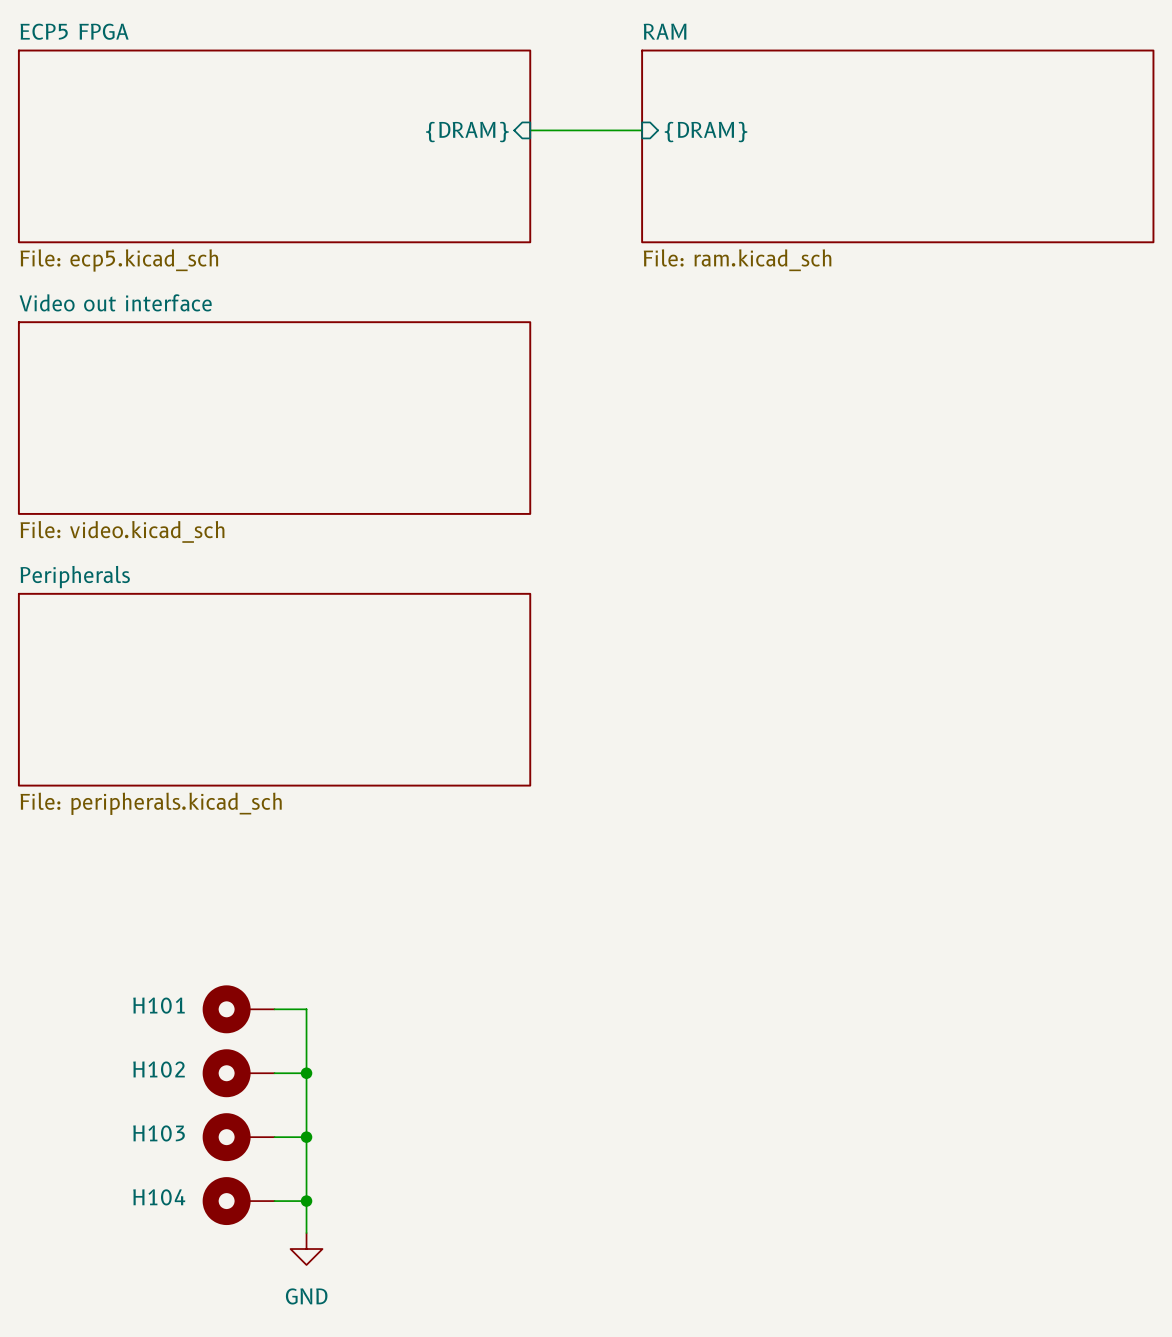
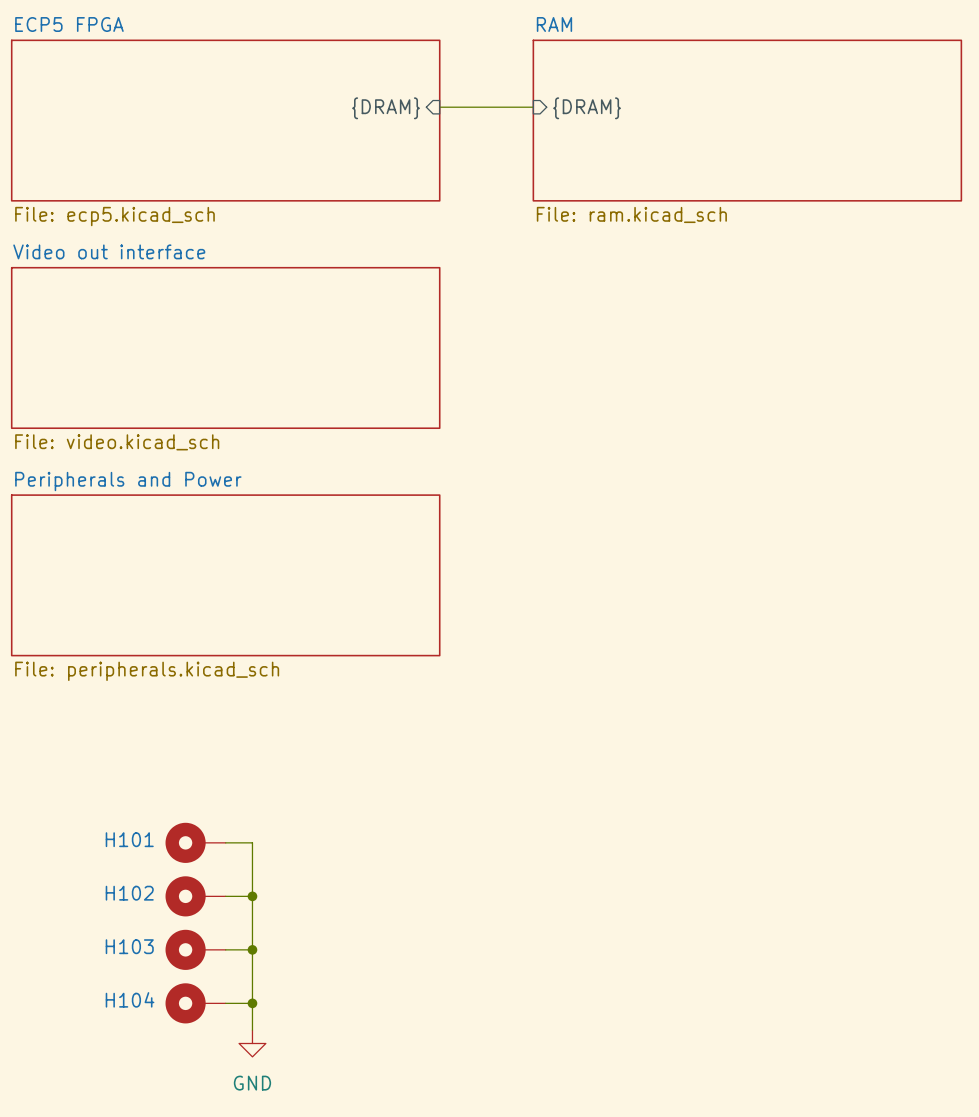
sheet Peripherals name: Peripherals (75, 577) -> Peripherals and Power (128, 481)

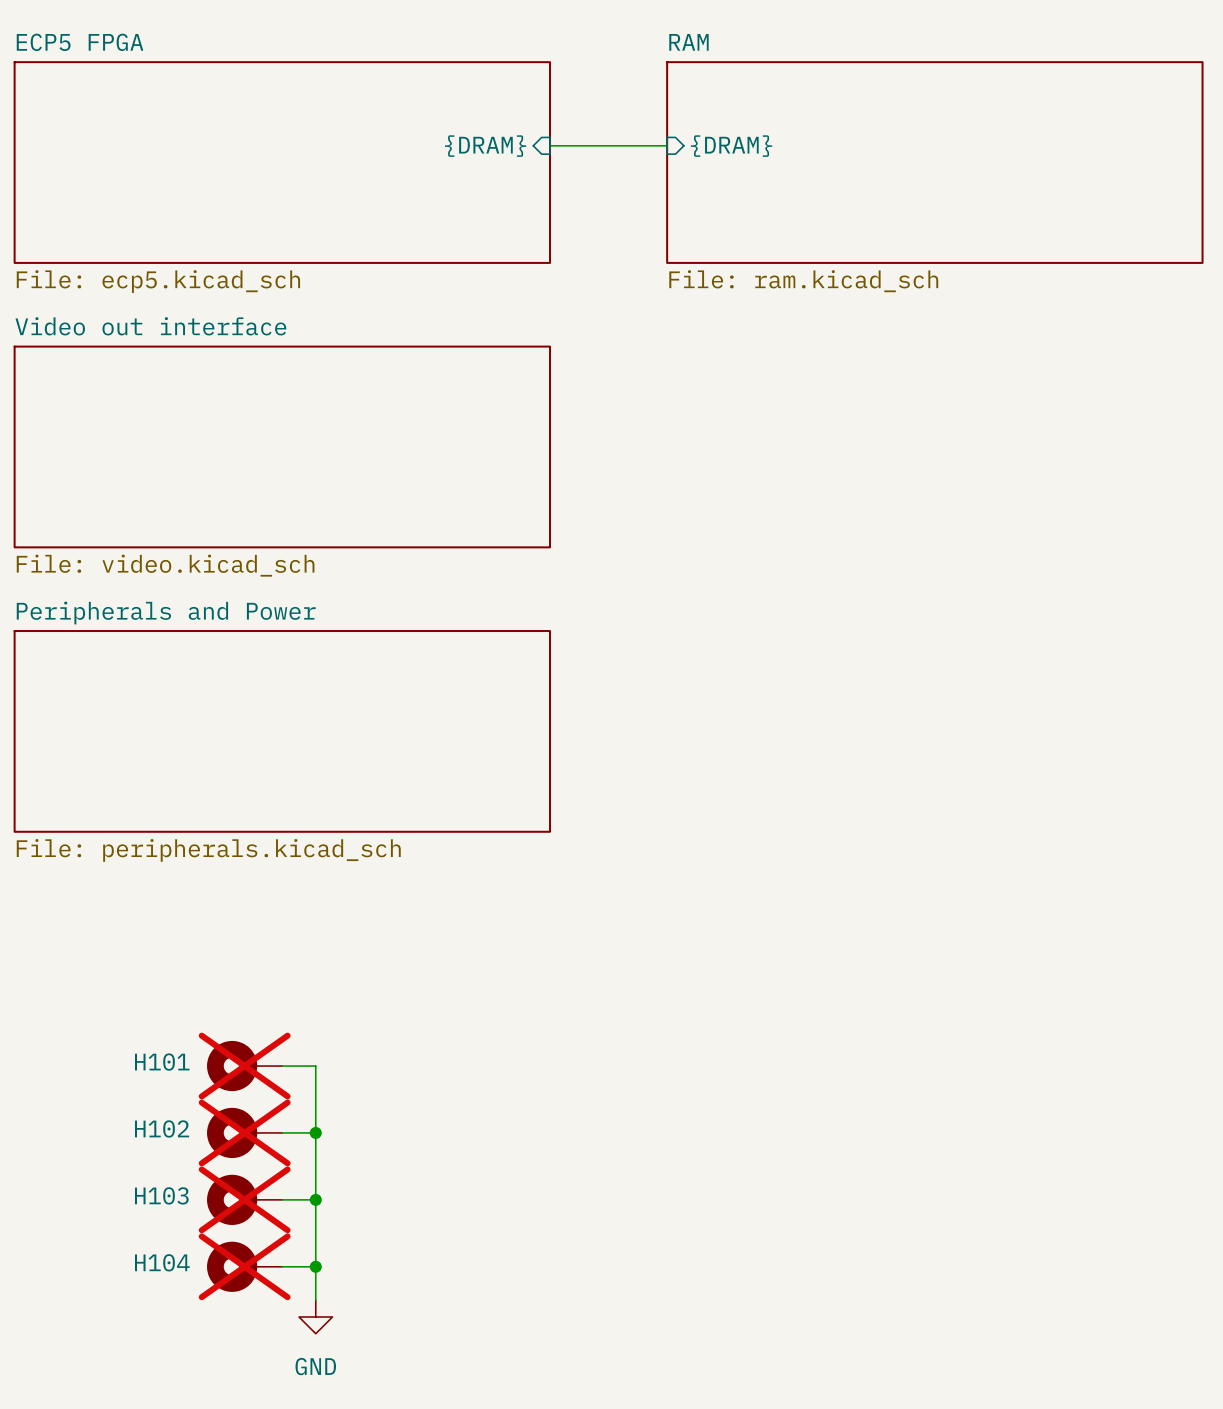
H101 do-not-place cross: none -> (244, 1066)
H102 do-not-place cross: none -> (244, 1132)
H103 do-not-place cross: none -> (244, 1199)
H104 do-not-place cross: none -> (244, 1266)

